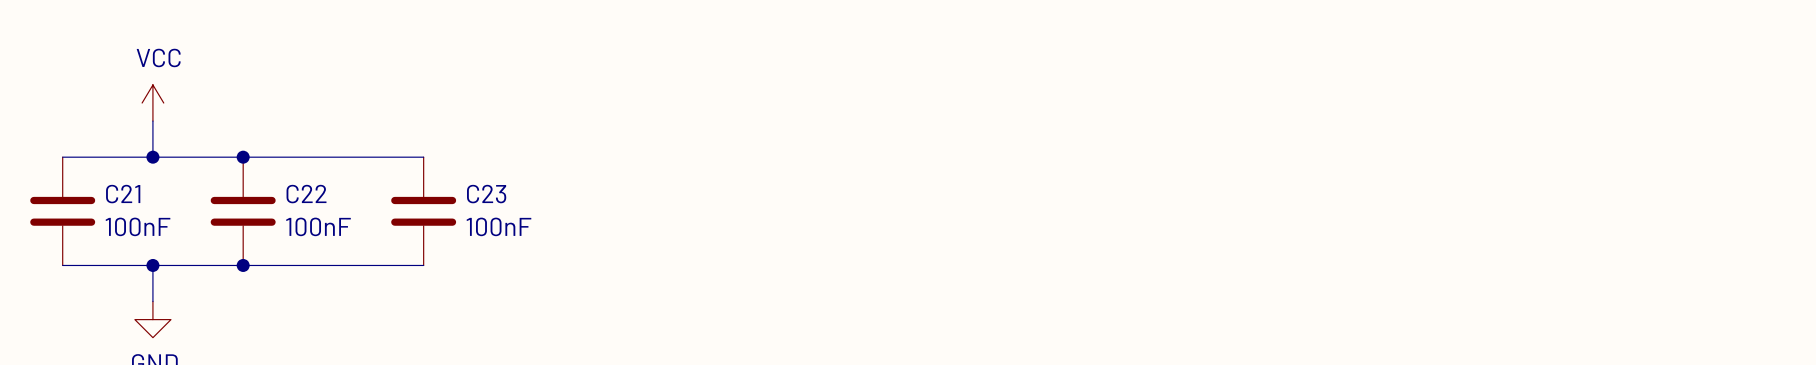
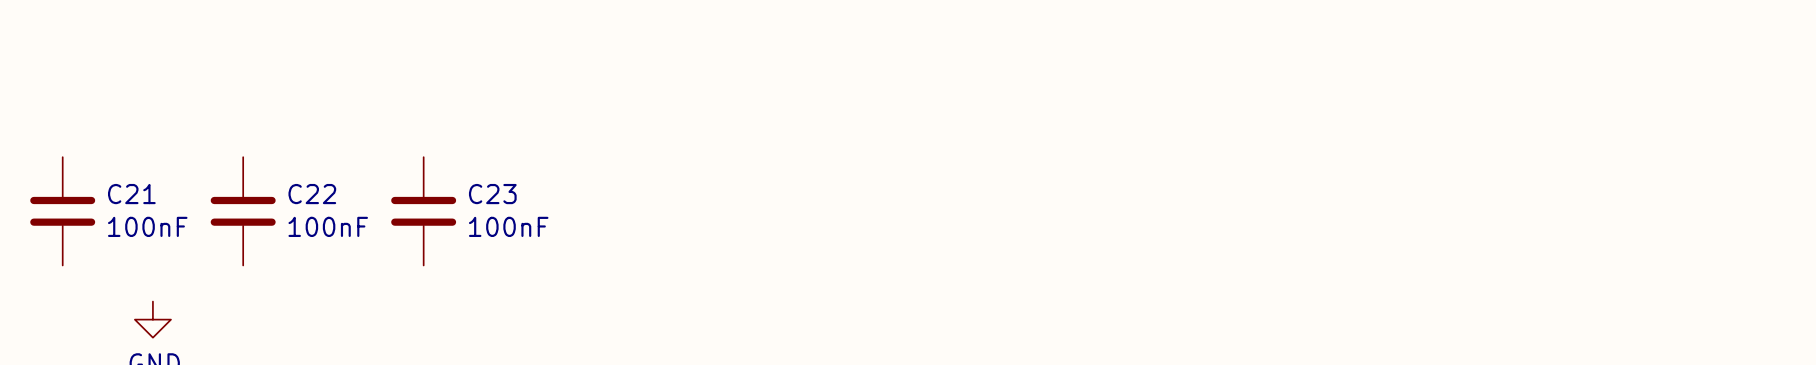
power symbol: VCC (152, 103) -> none
wire: (152, 121) (152, 157) -> none
wire: (62, 157) (423, 157) -> none
junction: (152, 157) -> none
junction: (243, 157) -> none
wire: (62, 265) (423, 265) -> none
wire: (152, 265) (152, 301) -> none
junction: (152, 265) -> none
junction: (243, 265) -> none

